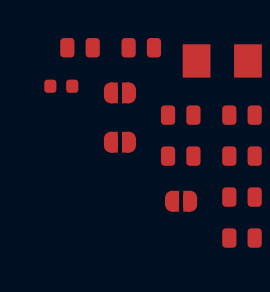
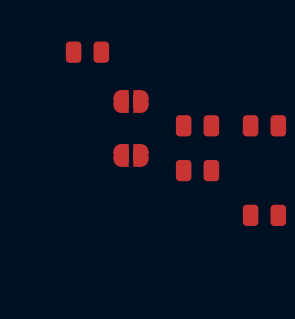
part: (141, 47) -> none
part: (222, 60) -> none
part: (61, 86) -> none
part: (241, 156) -> none
part: (181, 201) -> none
part: (241, 238) -> none

